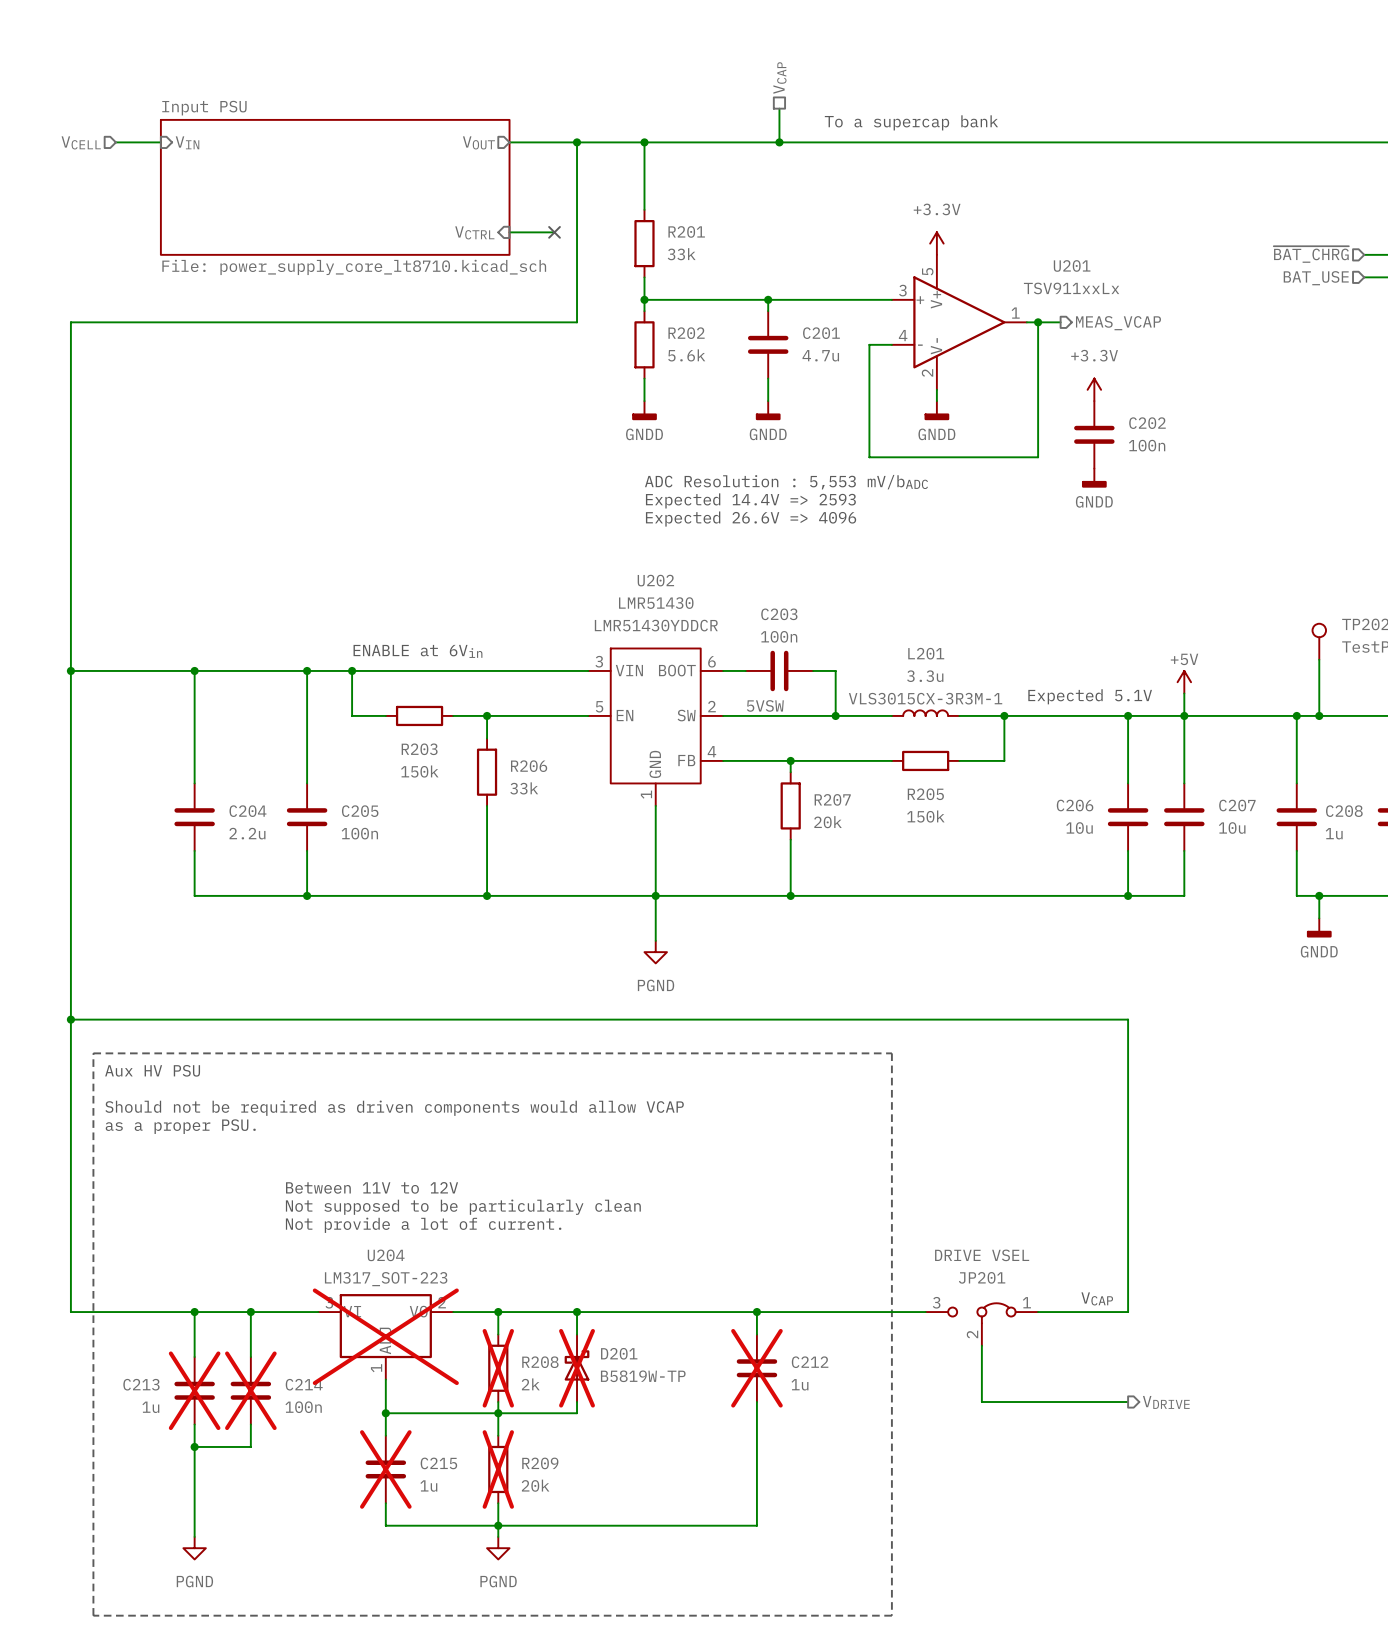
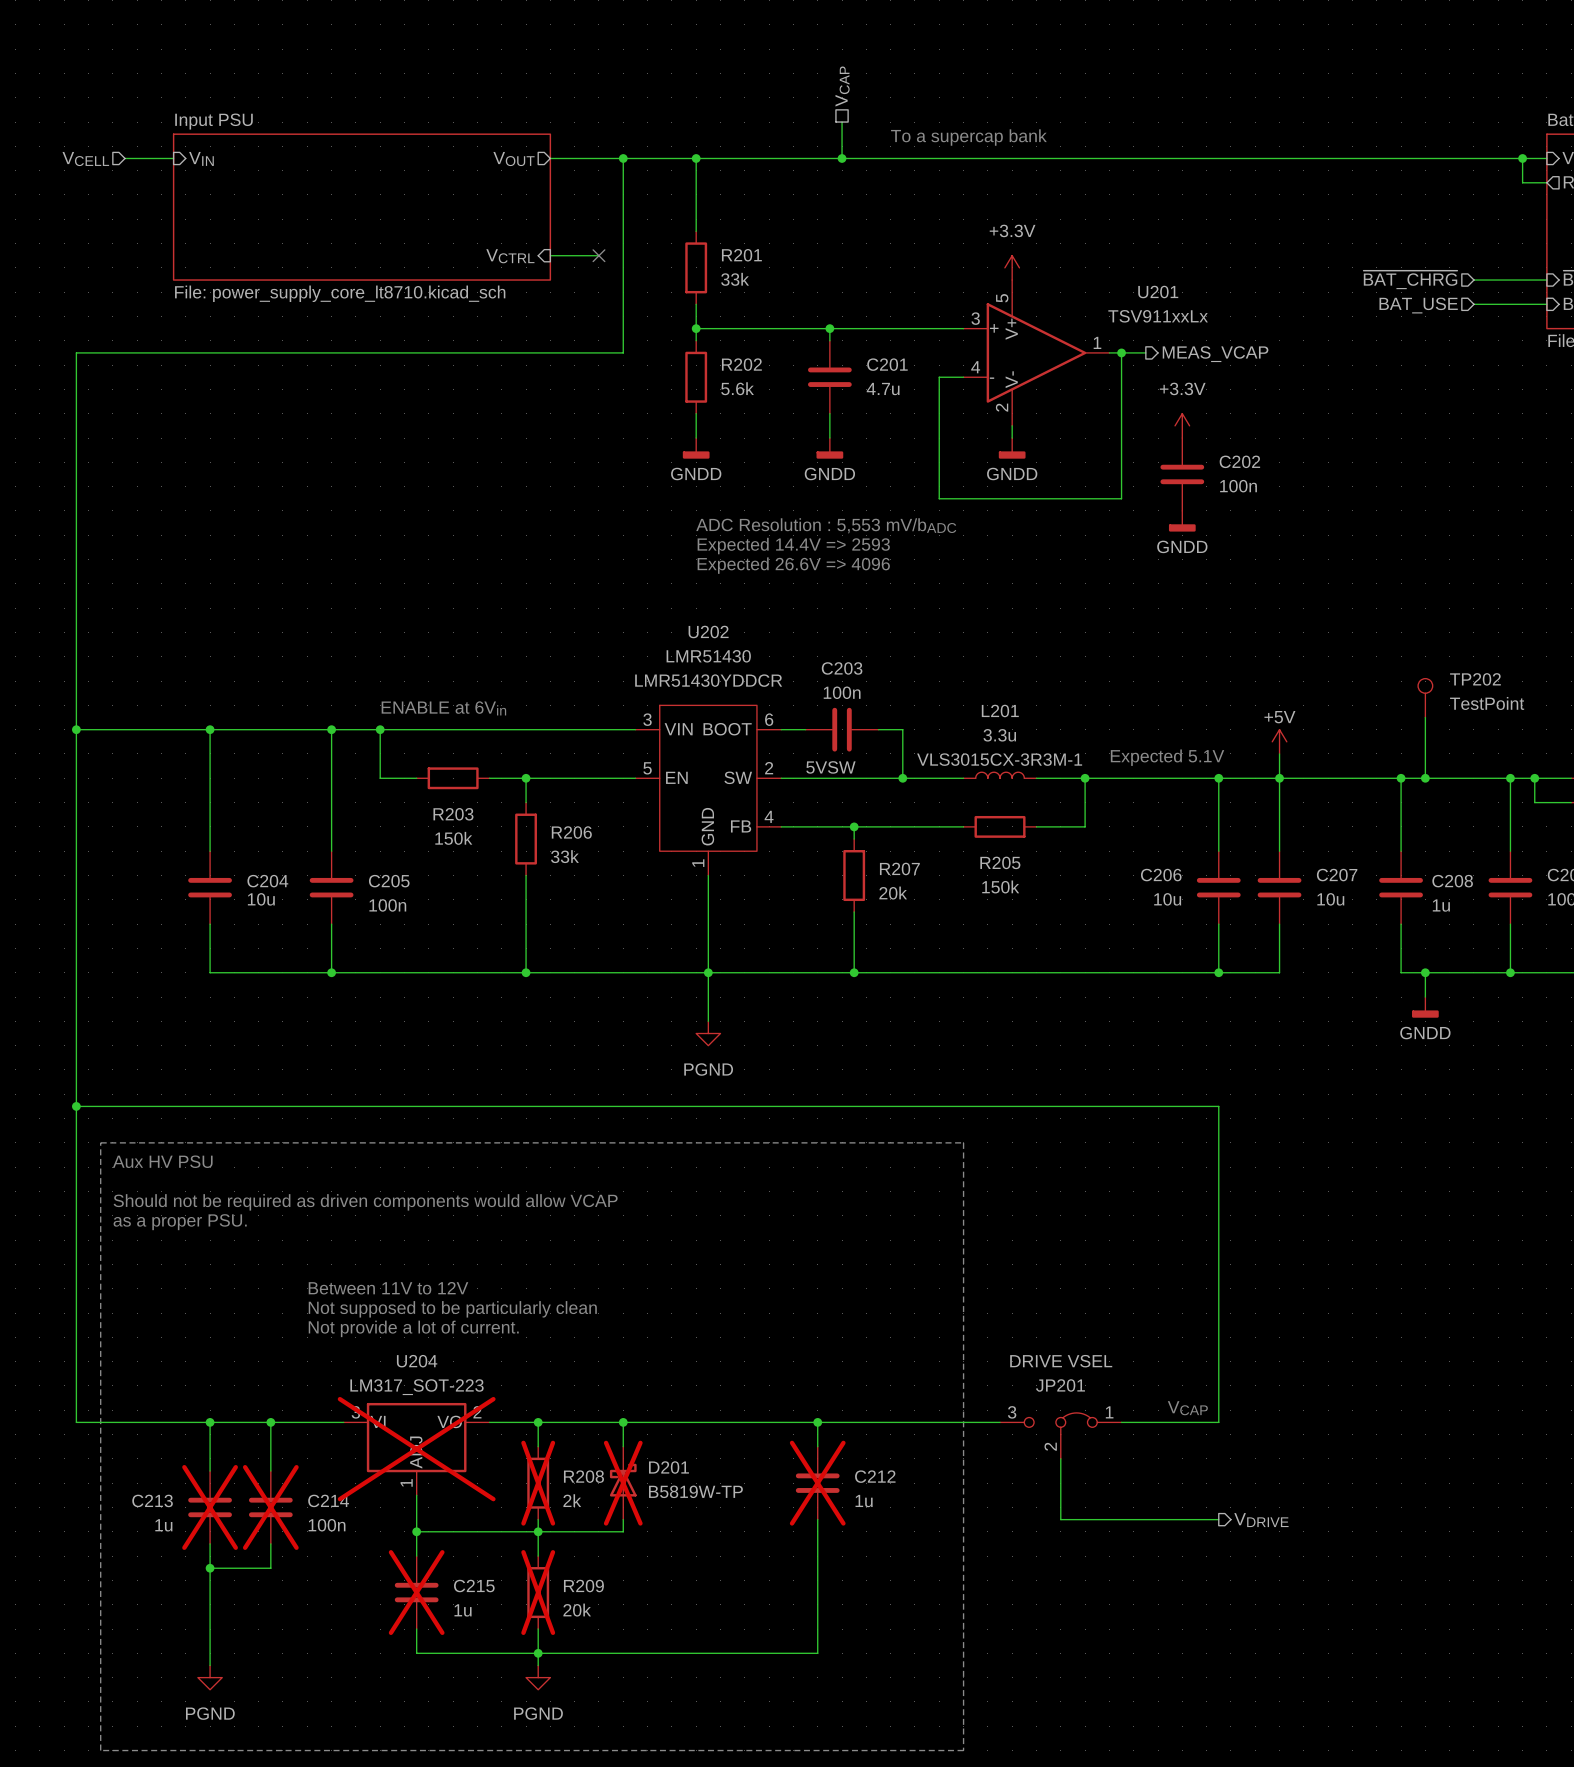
C204 value: 2.2u (247, 833) -> 10u (261, 899)

